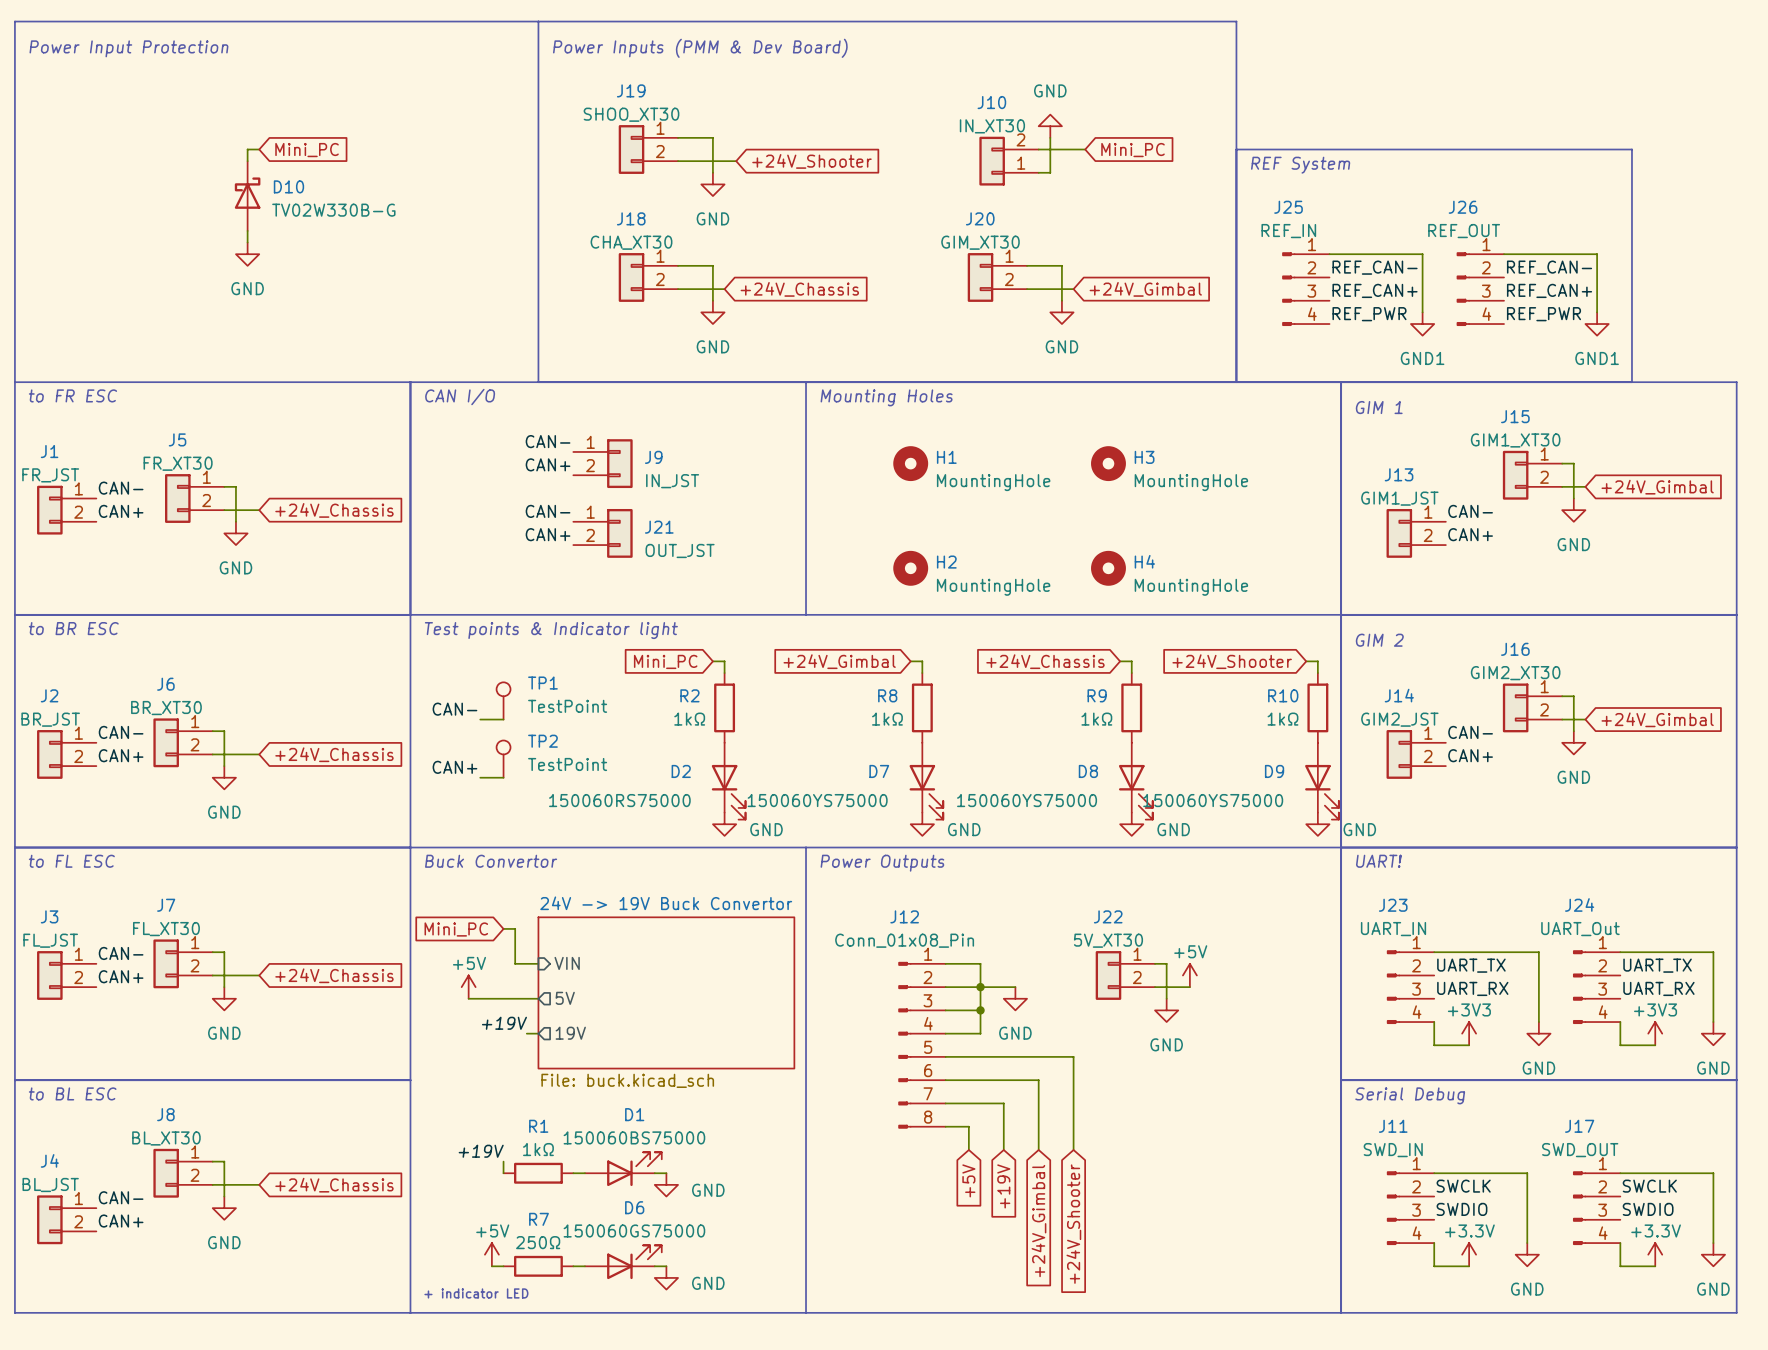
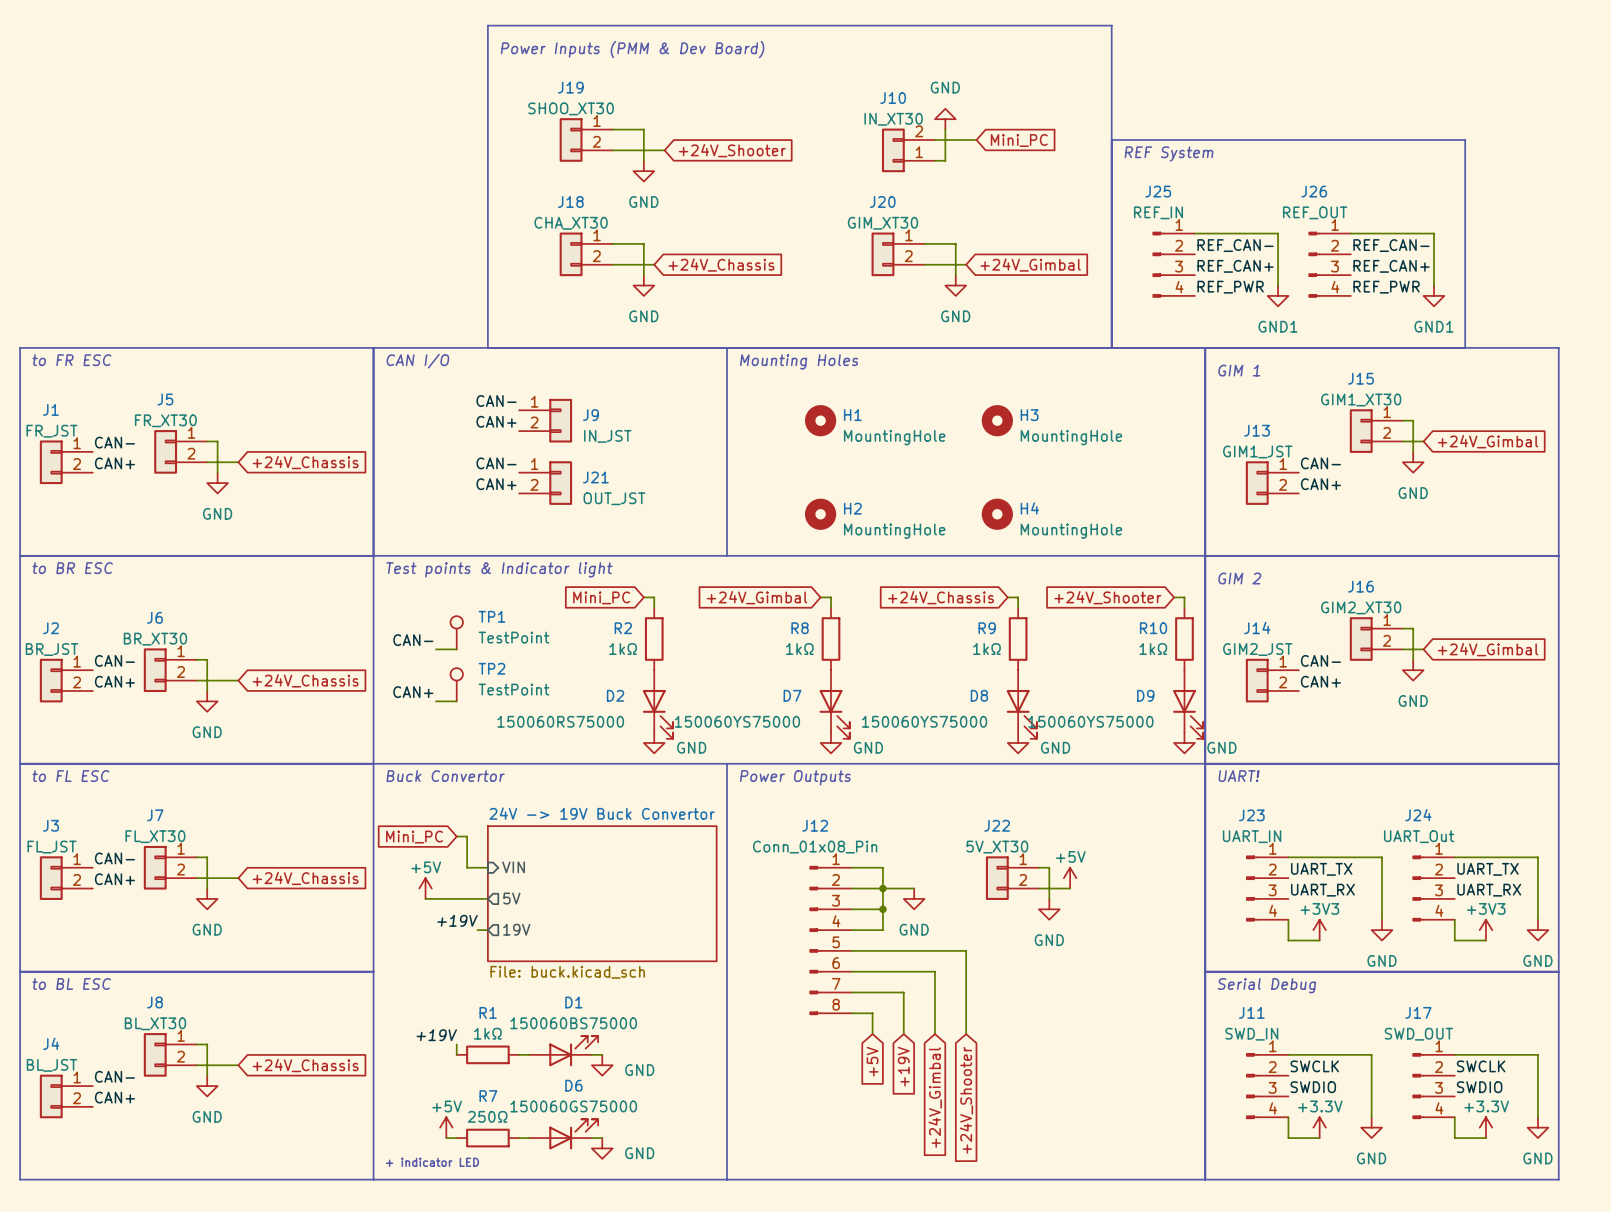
line: (538, 21) (14, 21) (14, 382) -> none
text: Power Input Protection (128, 48) -> none
wire: (259, 149) (247, 149) (247, 161) -> none
global label: Mini_PC (307, 150) -> none
D10: TV02W330B-G (247, 196) -> none
wire: (247, 230) (247, 242) -> none
power symbol: GND (247, 254) -> none

